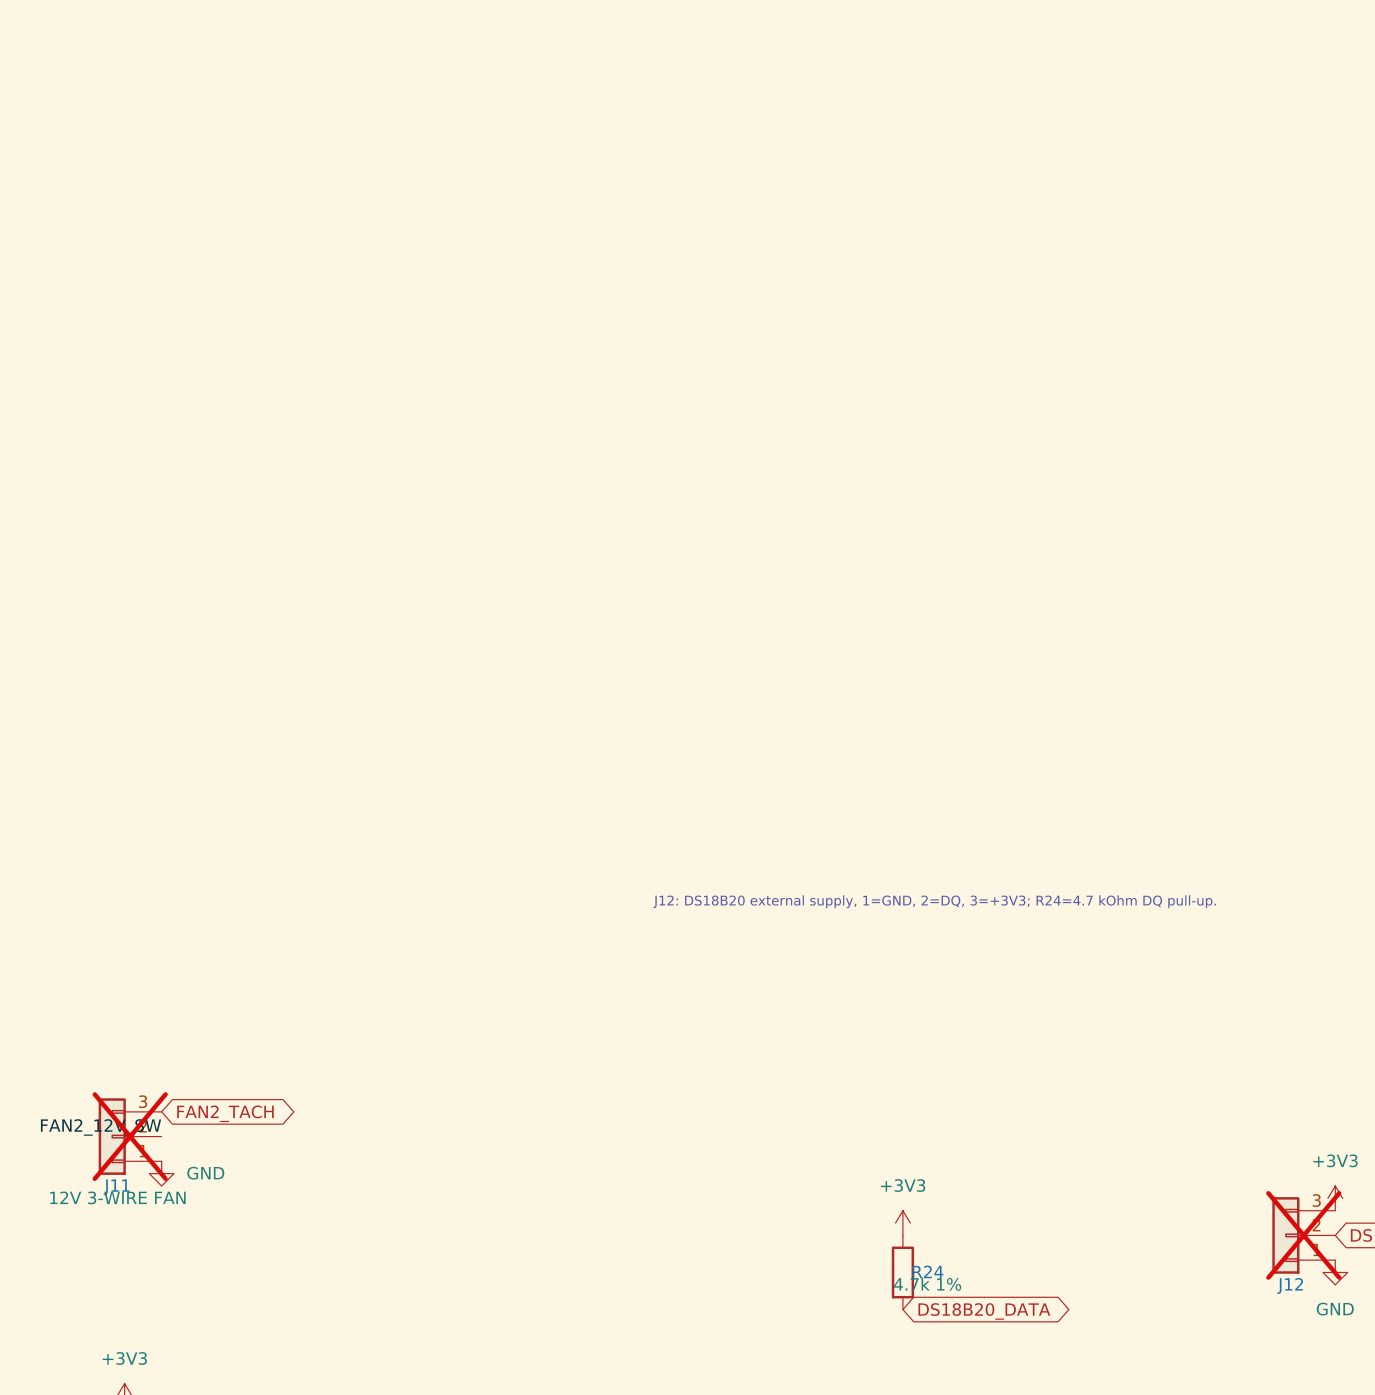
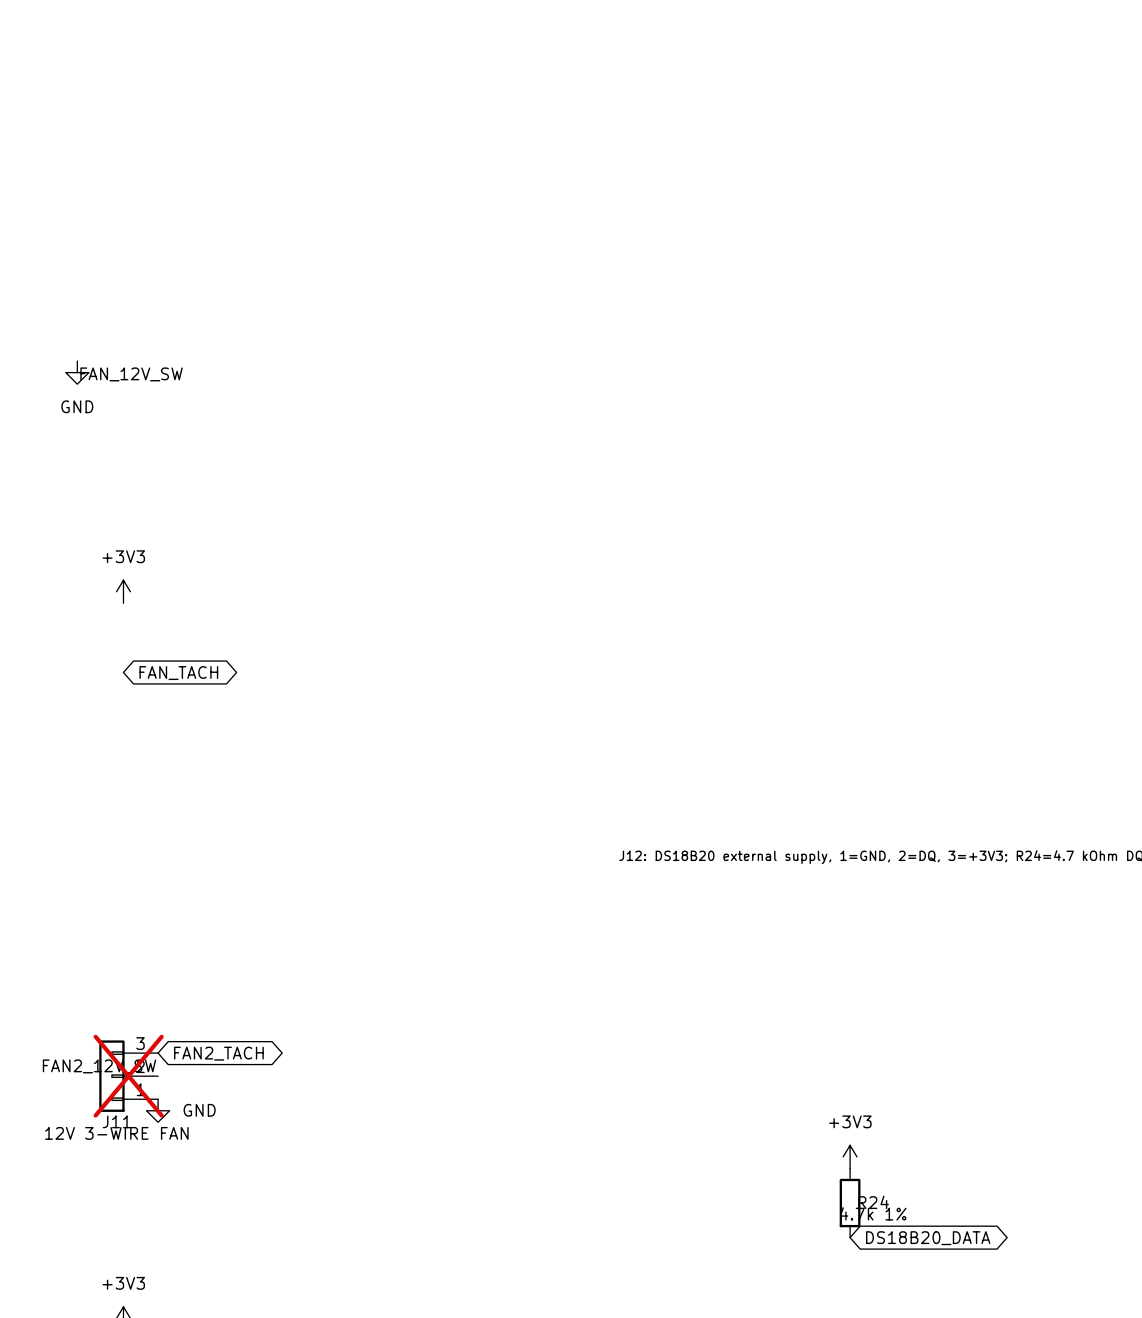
power symbol: none -> GND (77, 372)
label: none -> FAN_12V_SW (131, 374)
power symbol: none -> +3V3 (123, 591)
global label: none -> FAN_TACH (178, 673)

